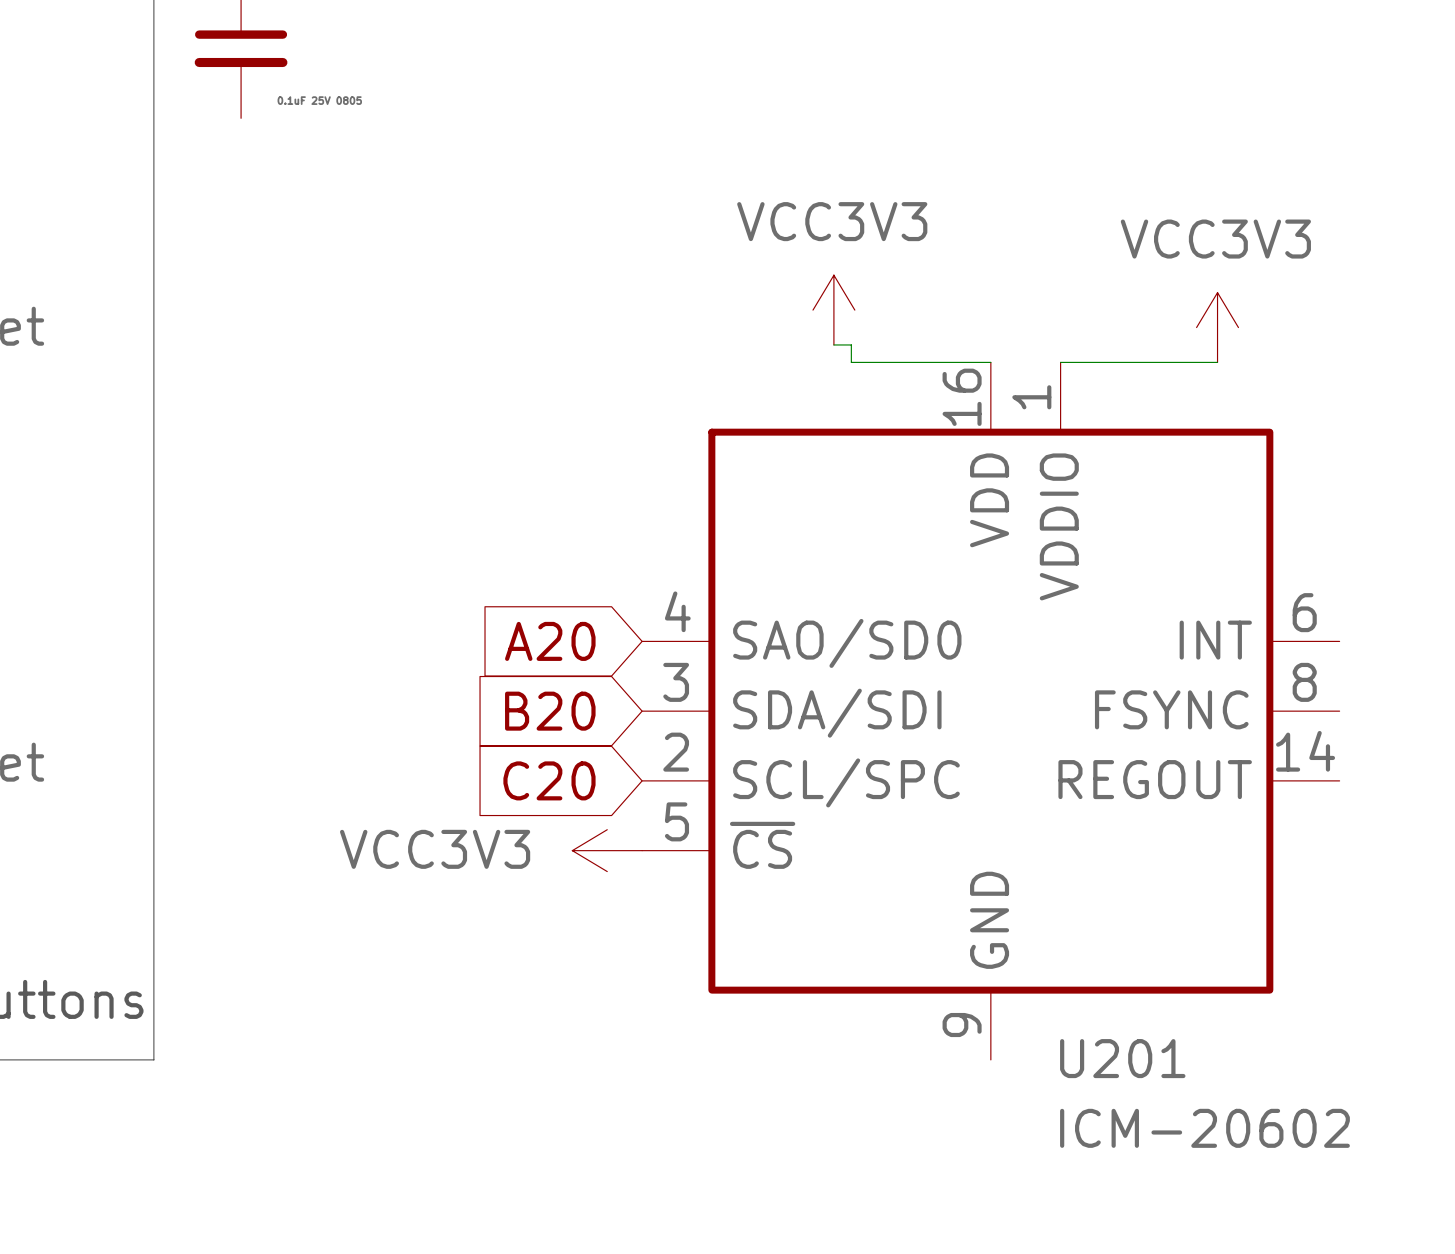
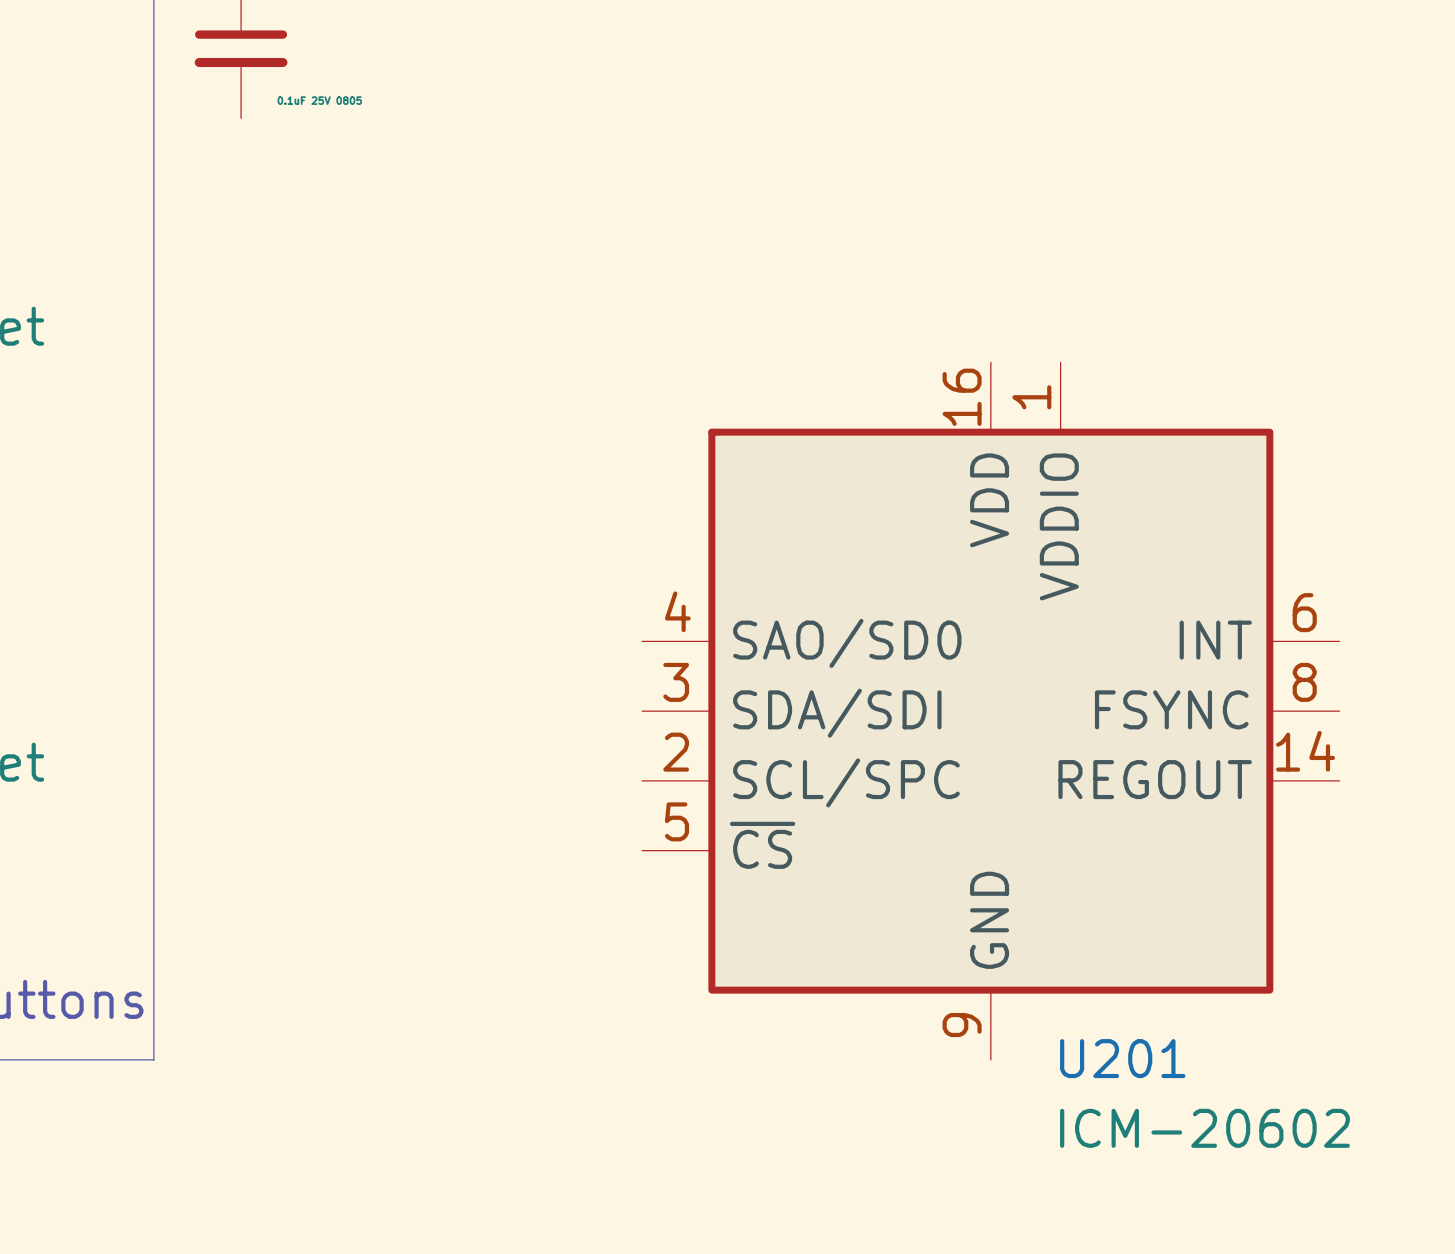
power symbol: VCC3V3 (833, 310) -> none
power symbol: VCC3V3 (1217, 327) -> none
wire: (833, 344) (851, 344) (851, 362) (990, 362) -> none
wire: (1060, 362) (1217, 362) -> none
global label: A20 (550, 641) -> none
global label: B20 (550, 711) -> none
global label: C20 (549, 780) -> none
power symbol: VCC3V3 (607, 850) -> none

